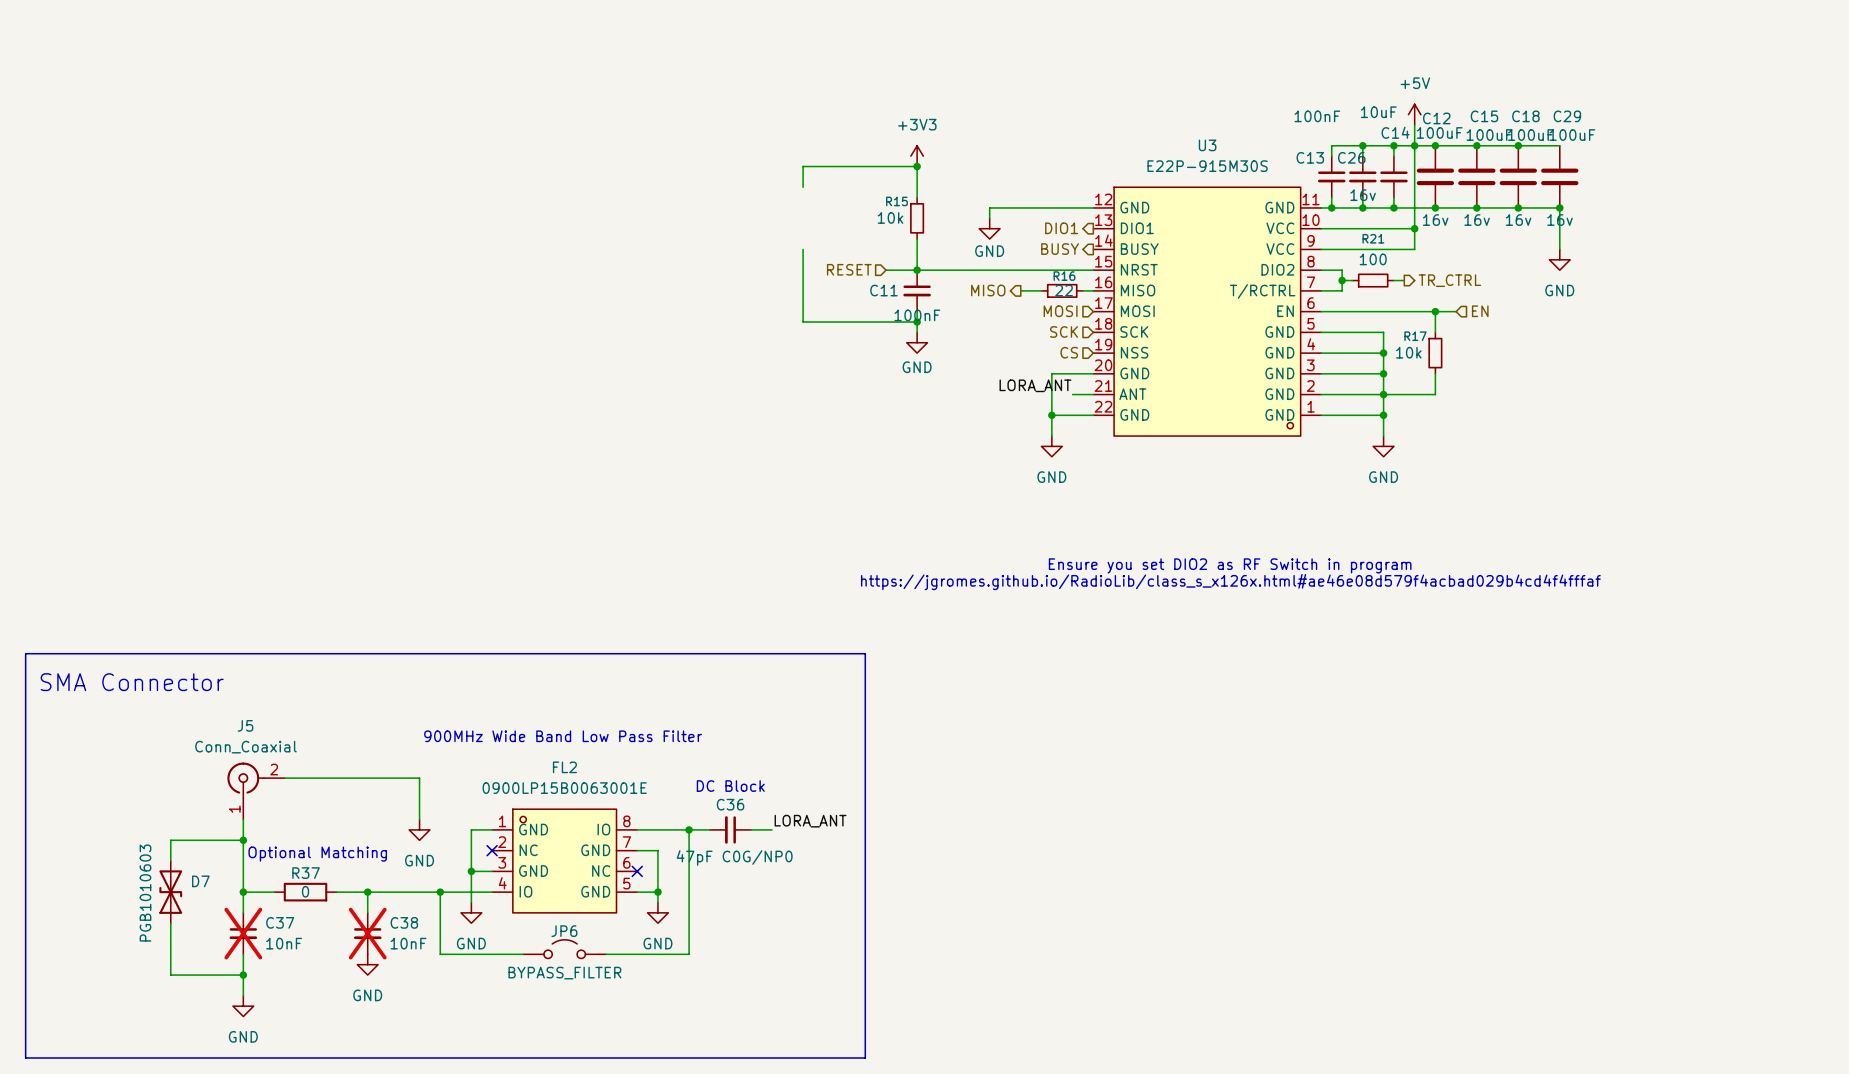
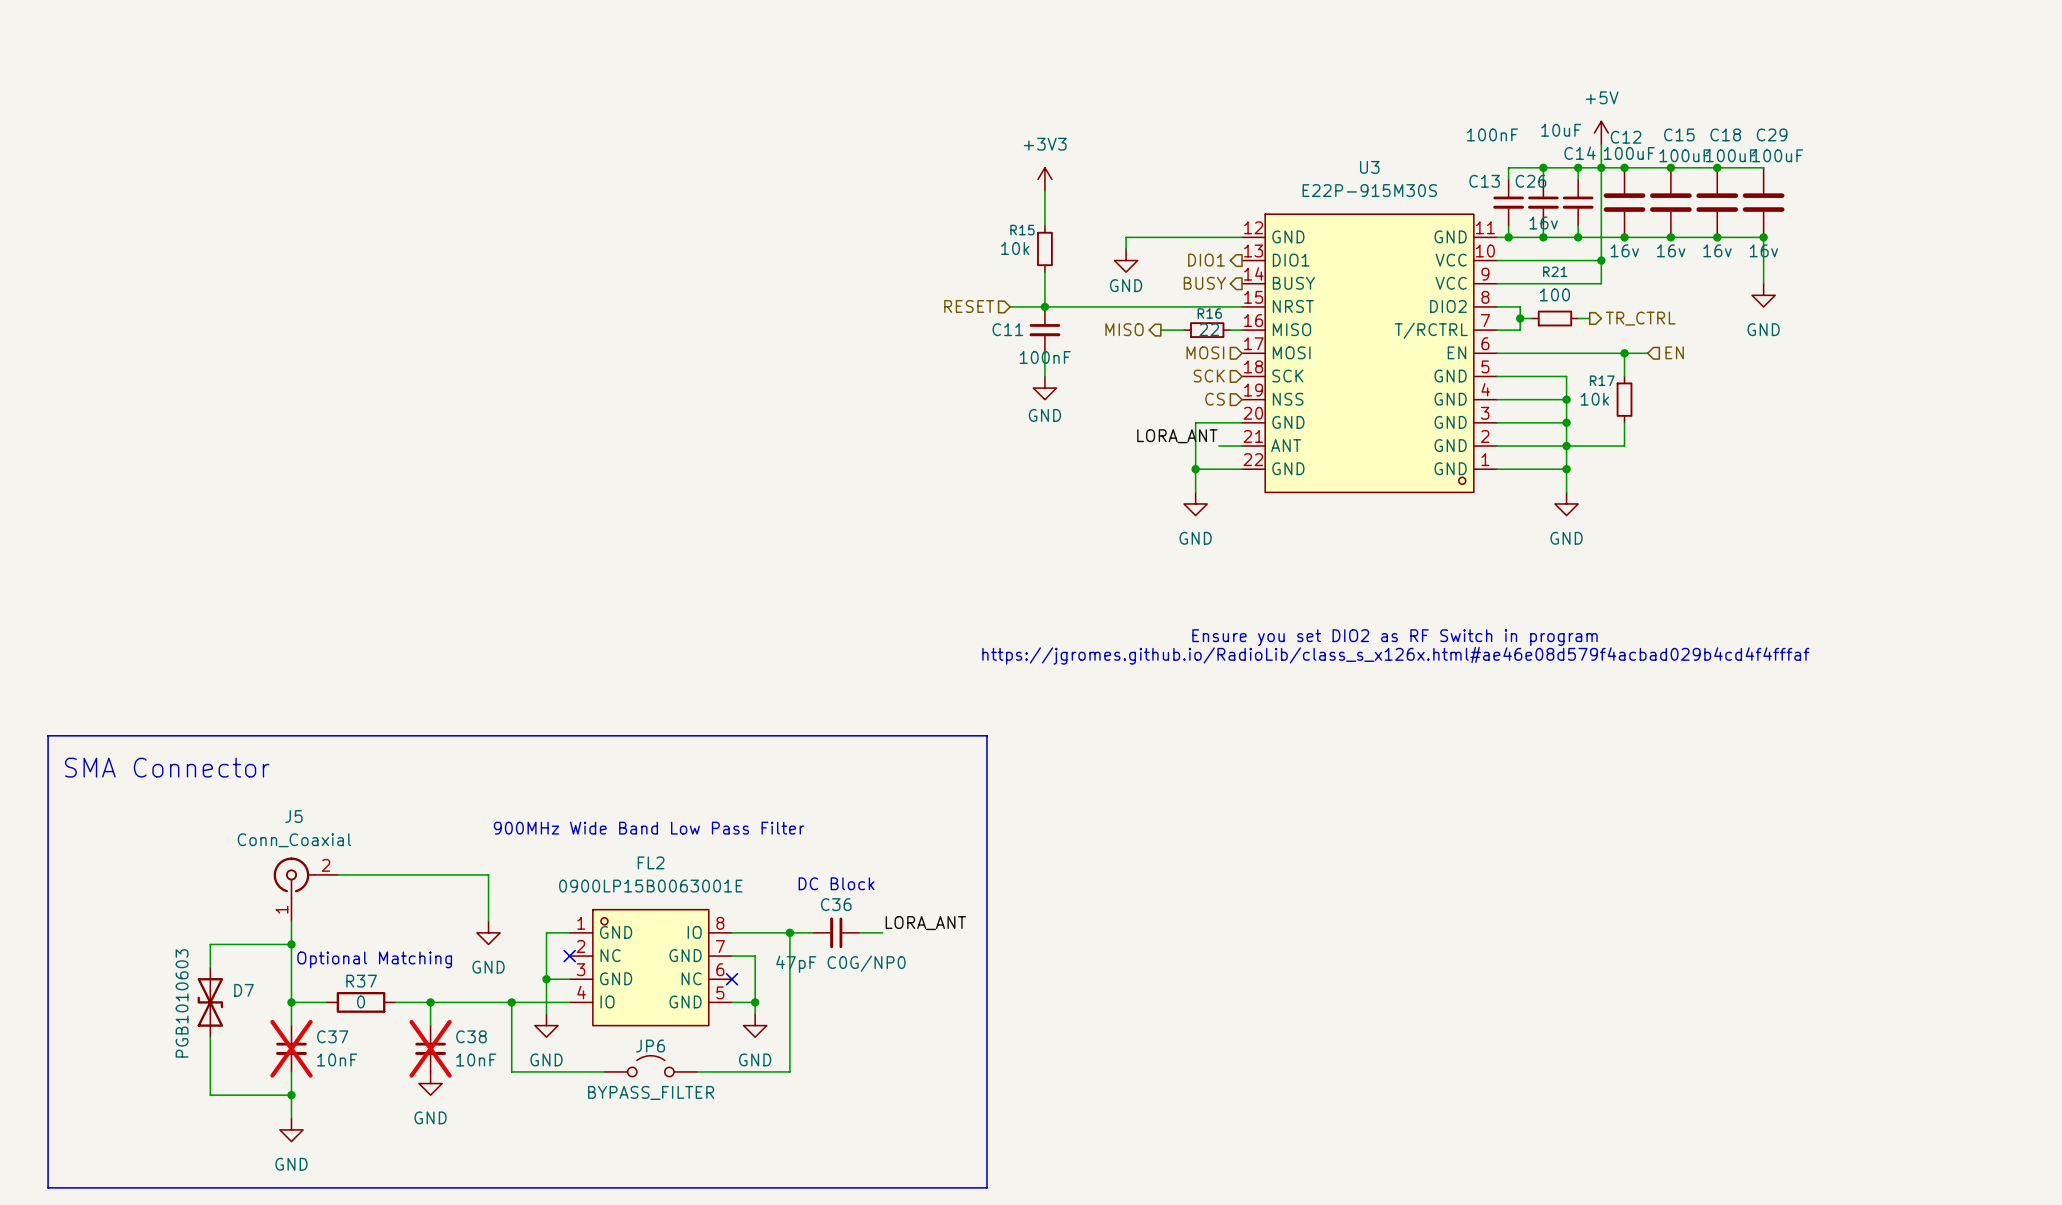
wire: (917, 166) (803, 166) (803, 187) -> none
junction: (917, 166) -> none
wire: (803, 249) (803, 322) (917, 322) -> none
junction: (917, 322) -> none

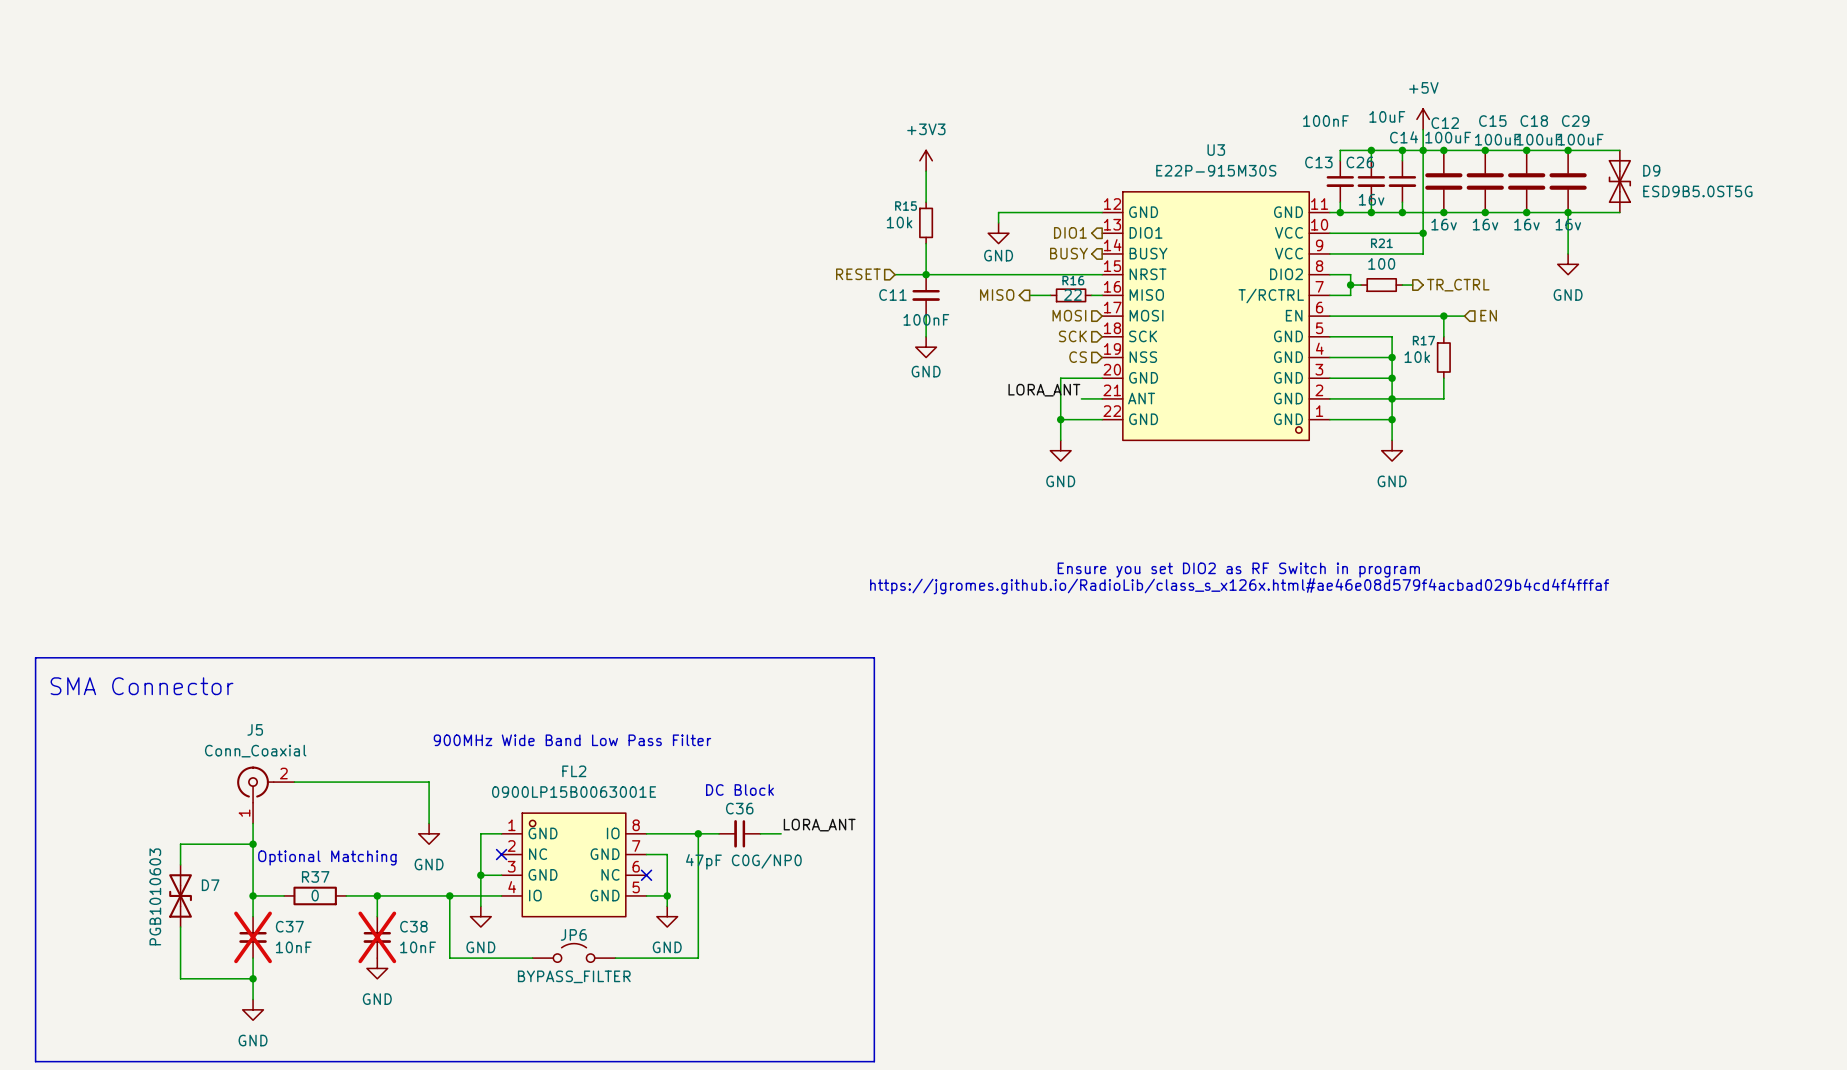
wire: none -> (1568, 150) (1619, 150)
junction: none -> (1568, 150)
D9: none -> ESD9B5.0ST5G (1619, 181)
wire: none -> (1568, 212) (1619, 212)

